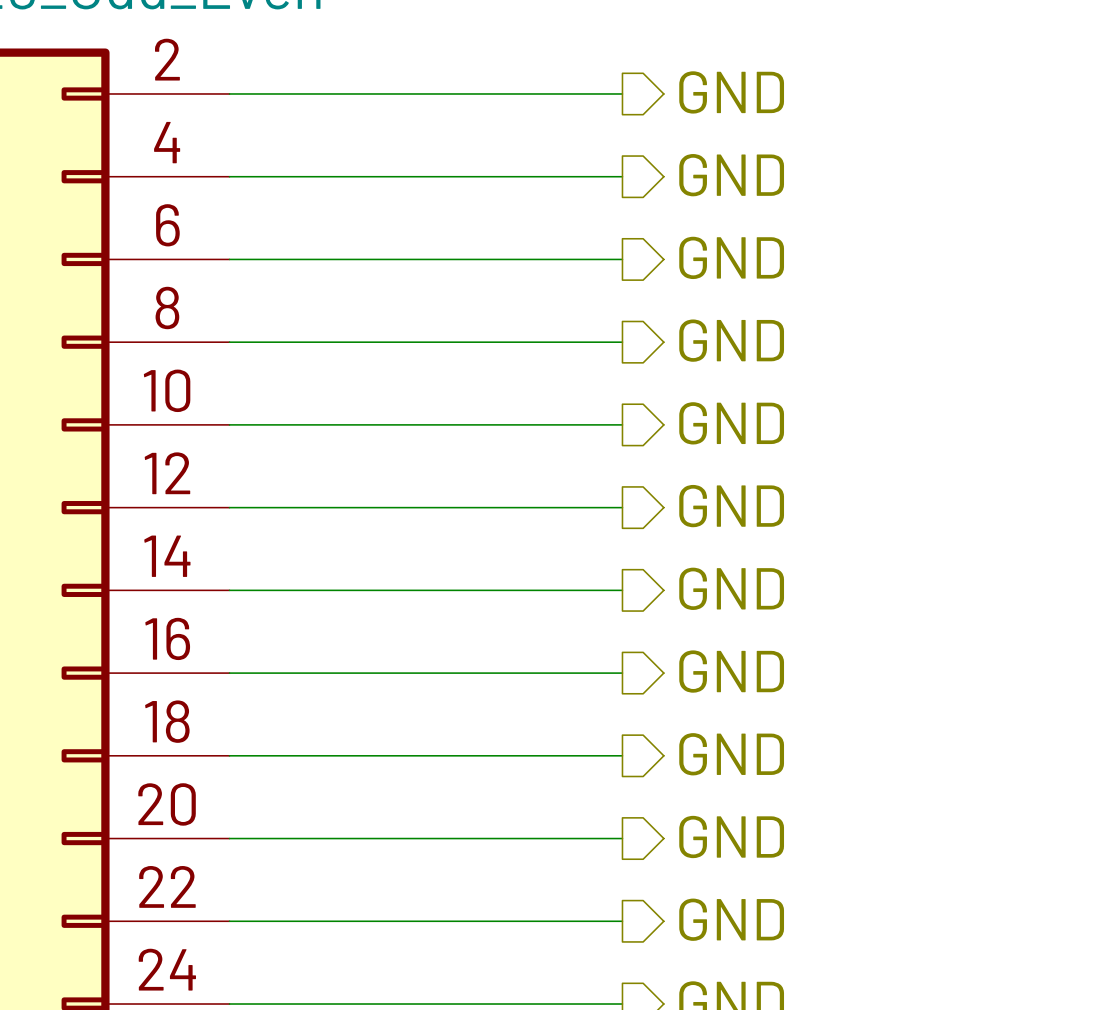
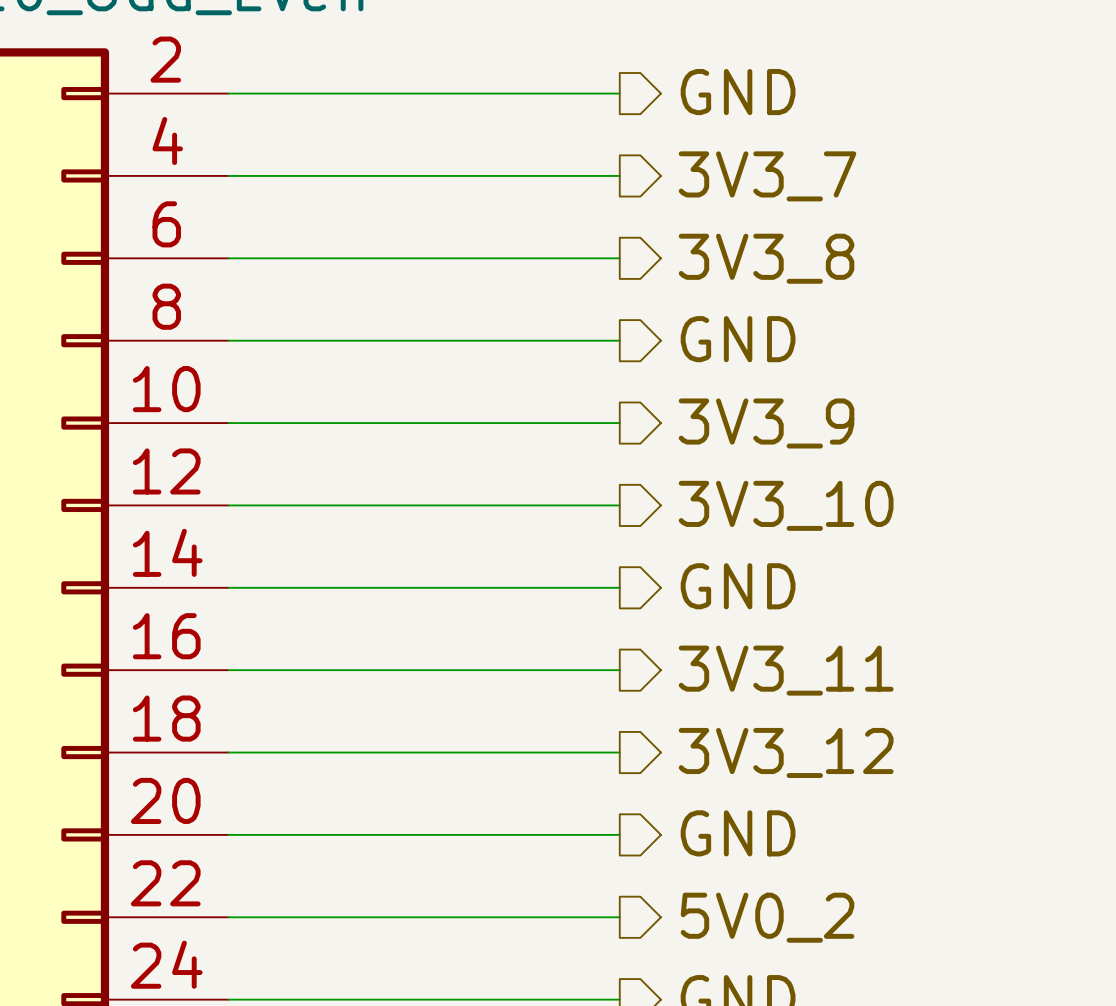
hierarchical label: GND (731, 175) -> 3V3_7 (767, 176)
hierarchical label: GND (731, 257) -> 3V3_8 (766, 258)
hierarchical label: GND (731, 423) -> 3V3_9 (766, 423)
hierarchical label: GND (731, 506) -> 3V3_10 (786, 505)
hierarchical label: GND (731, 671) -> 3V3_11 (786, 670)
hierarchical label: GND (731, 754) -> 3V3_12 (786, 752)
hierarchical label: GND (731, 919) -> 5V0_2 (767, 917)

